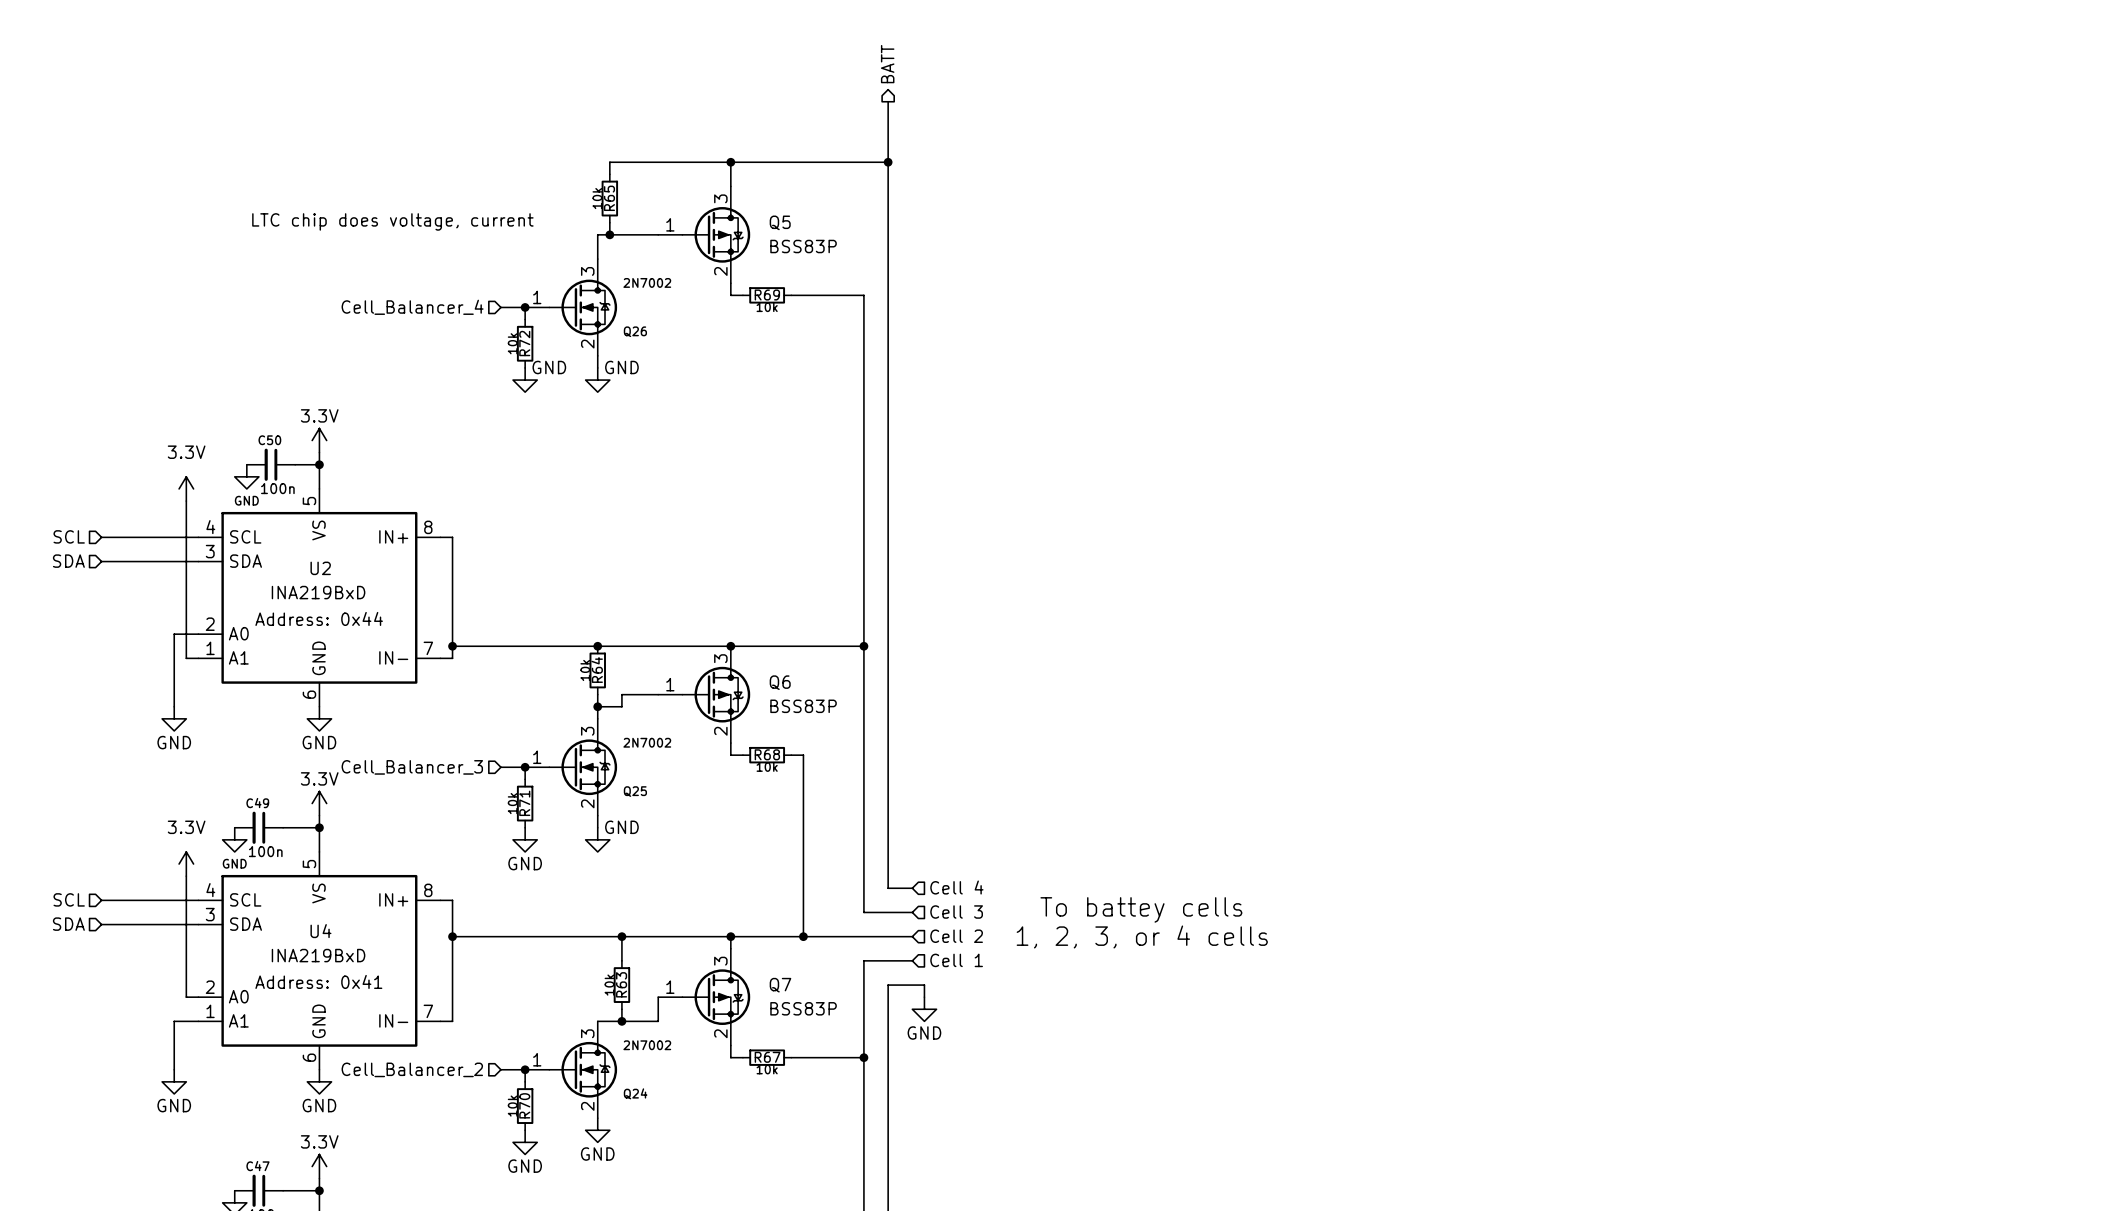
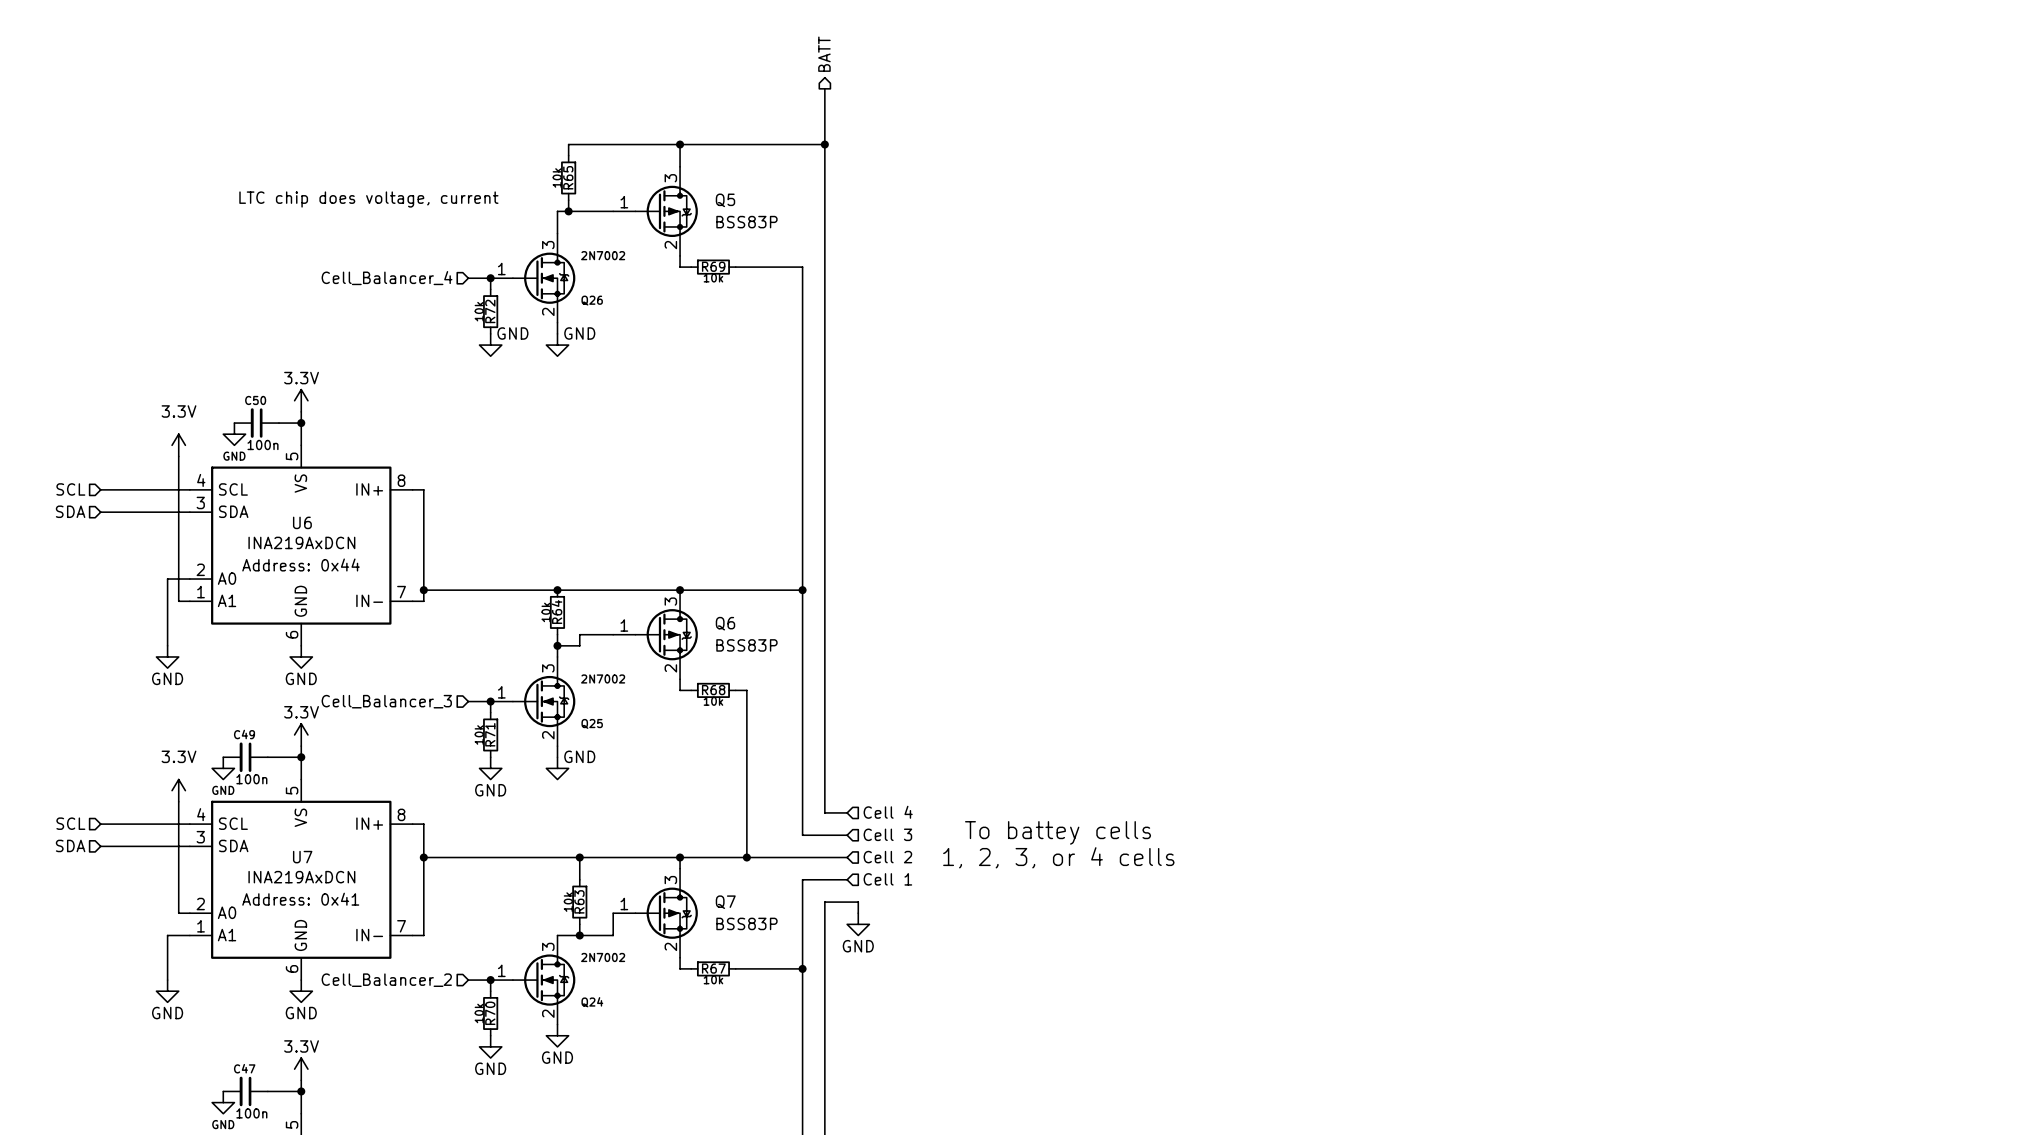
U2 name: U2 (320, 568) -> U6 (302, 522)
U2 value: INA219BxD (318, 592) -> INA219AxDCN (301, 542)
U4 name: U4 (320, 931) -> U7 (302, 857)
U4 value: INA219BxD (318, 955) -> INA219AxDCN (301, 877)

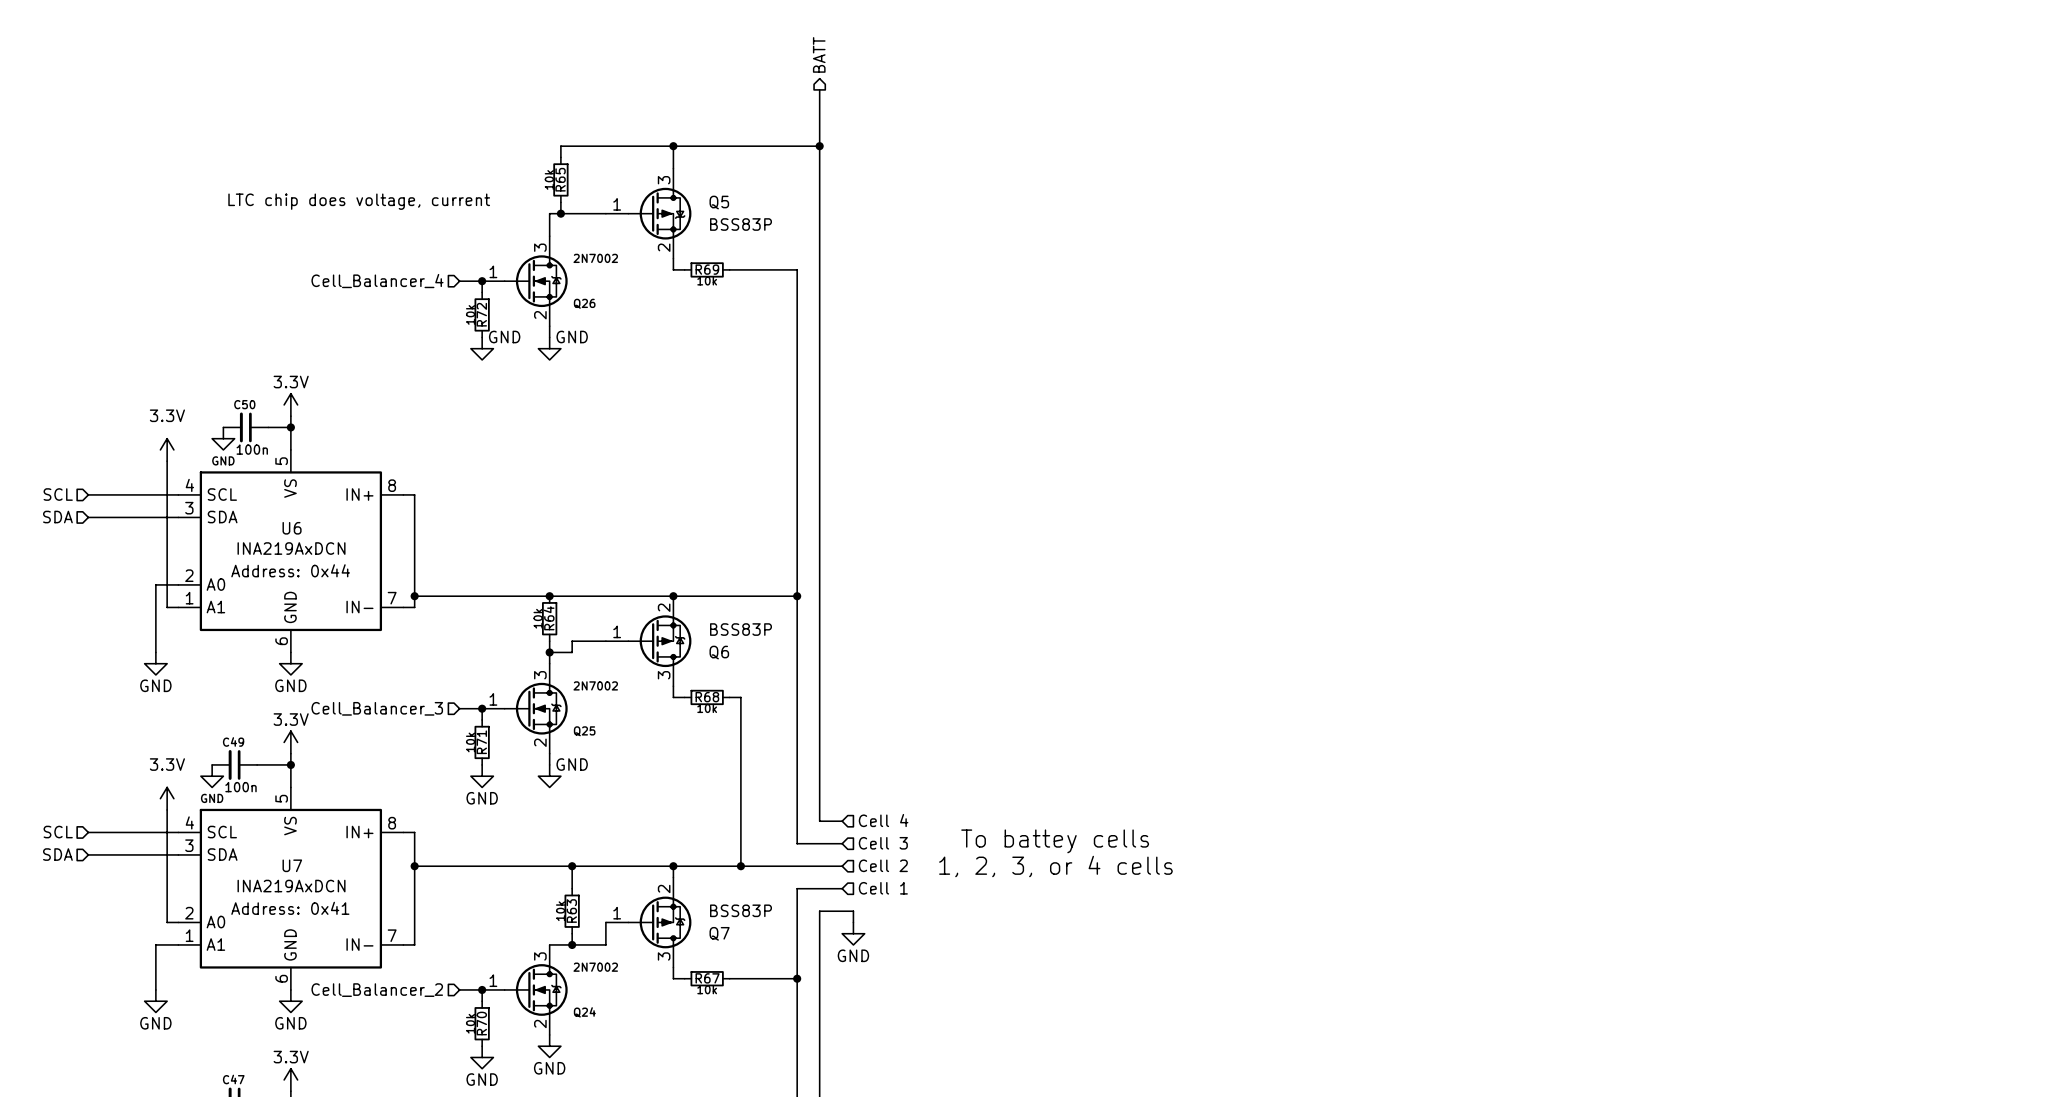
Q6 flip: as is (666, 634) -> up-down (659, 641)
Q7 flip: as is (666, 913) -> up-down (659, 922)

